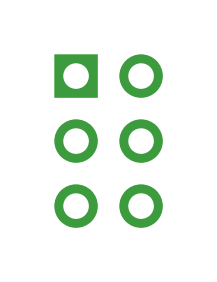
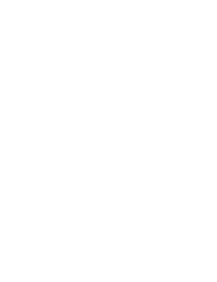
part: (108, 141) -> none

